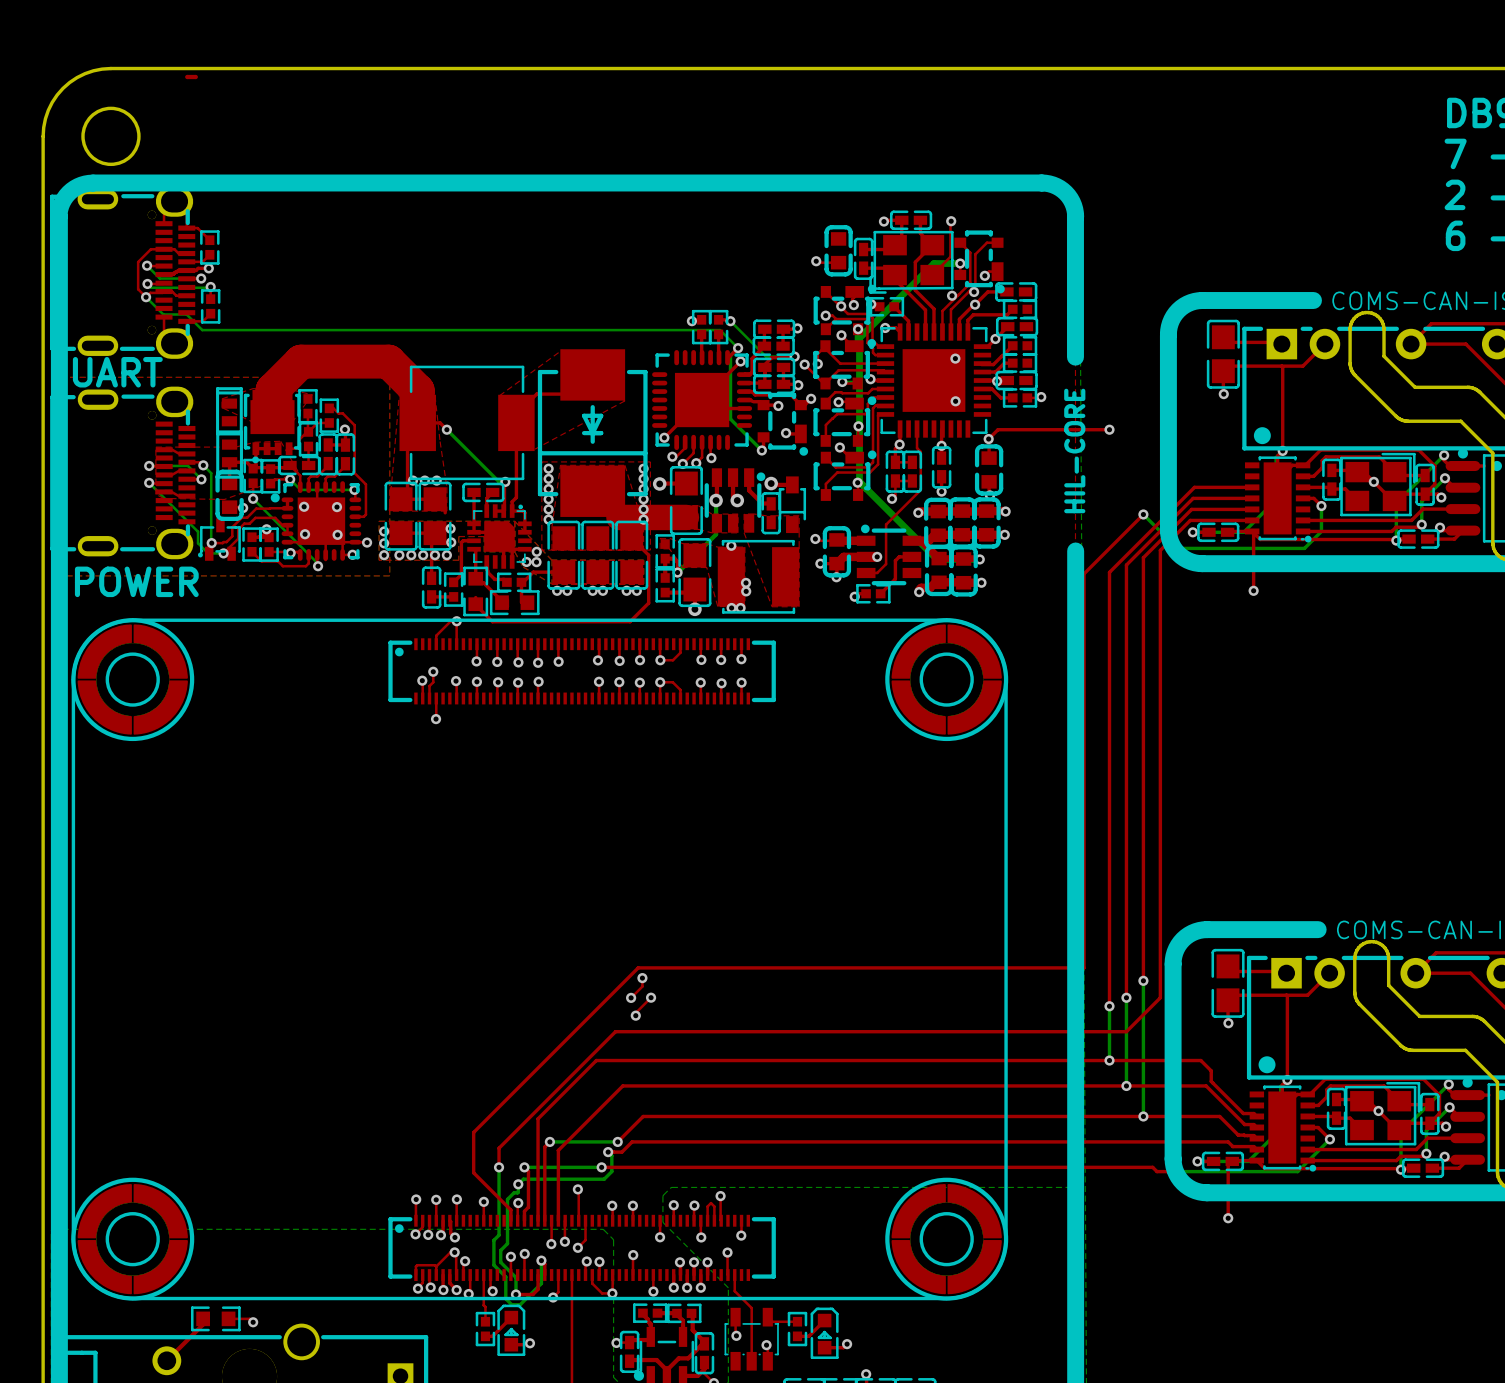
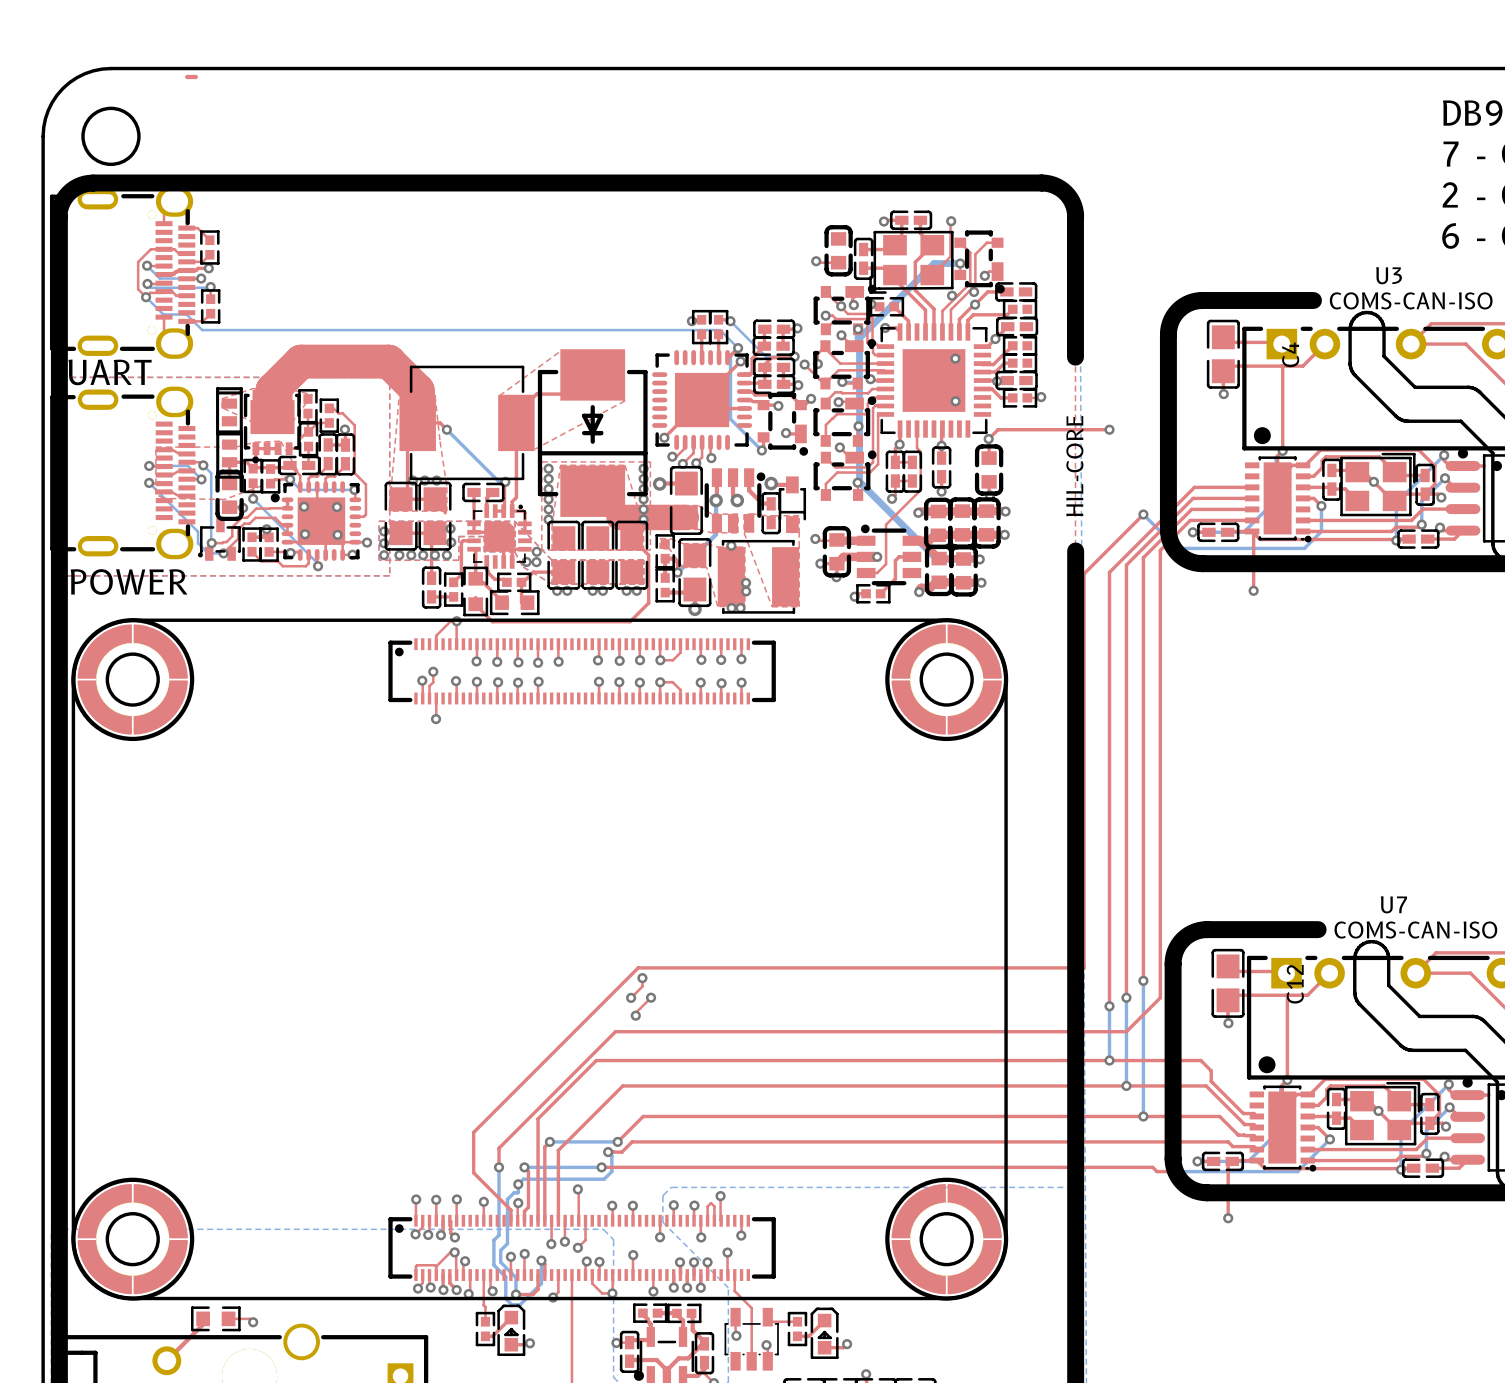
U3 name: none -> U3 (1389, 275)
C4 name: none -> C4 (1290, 354)
U7 name: none -> U7 (1393, 904)
C12 name: none -> C12 (1295, 984)

